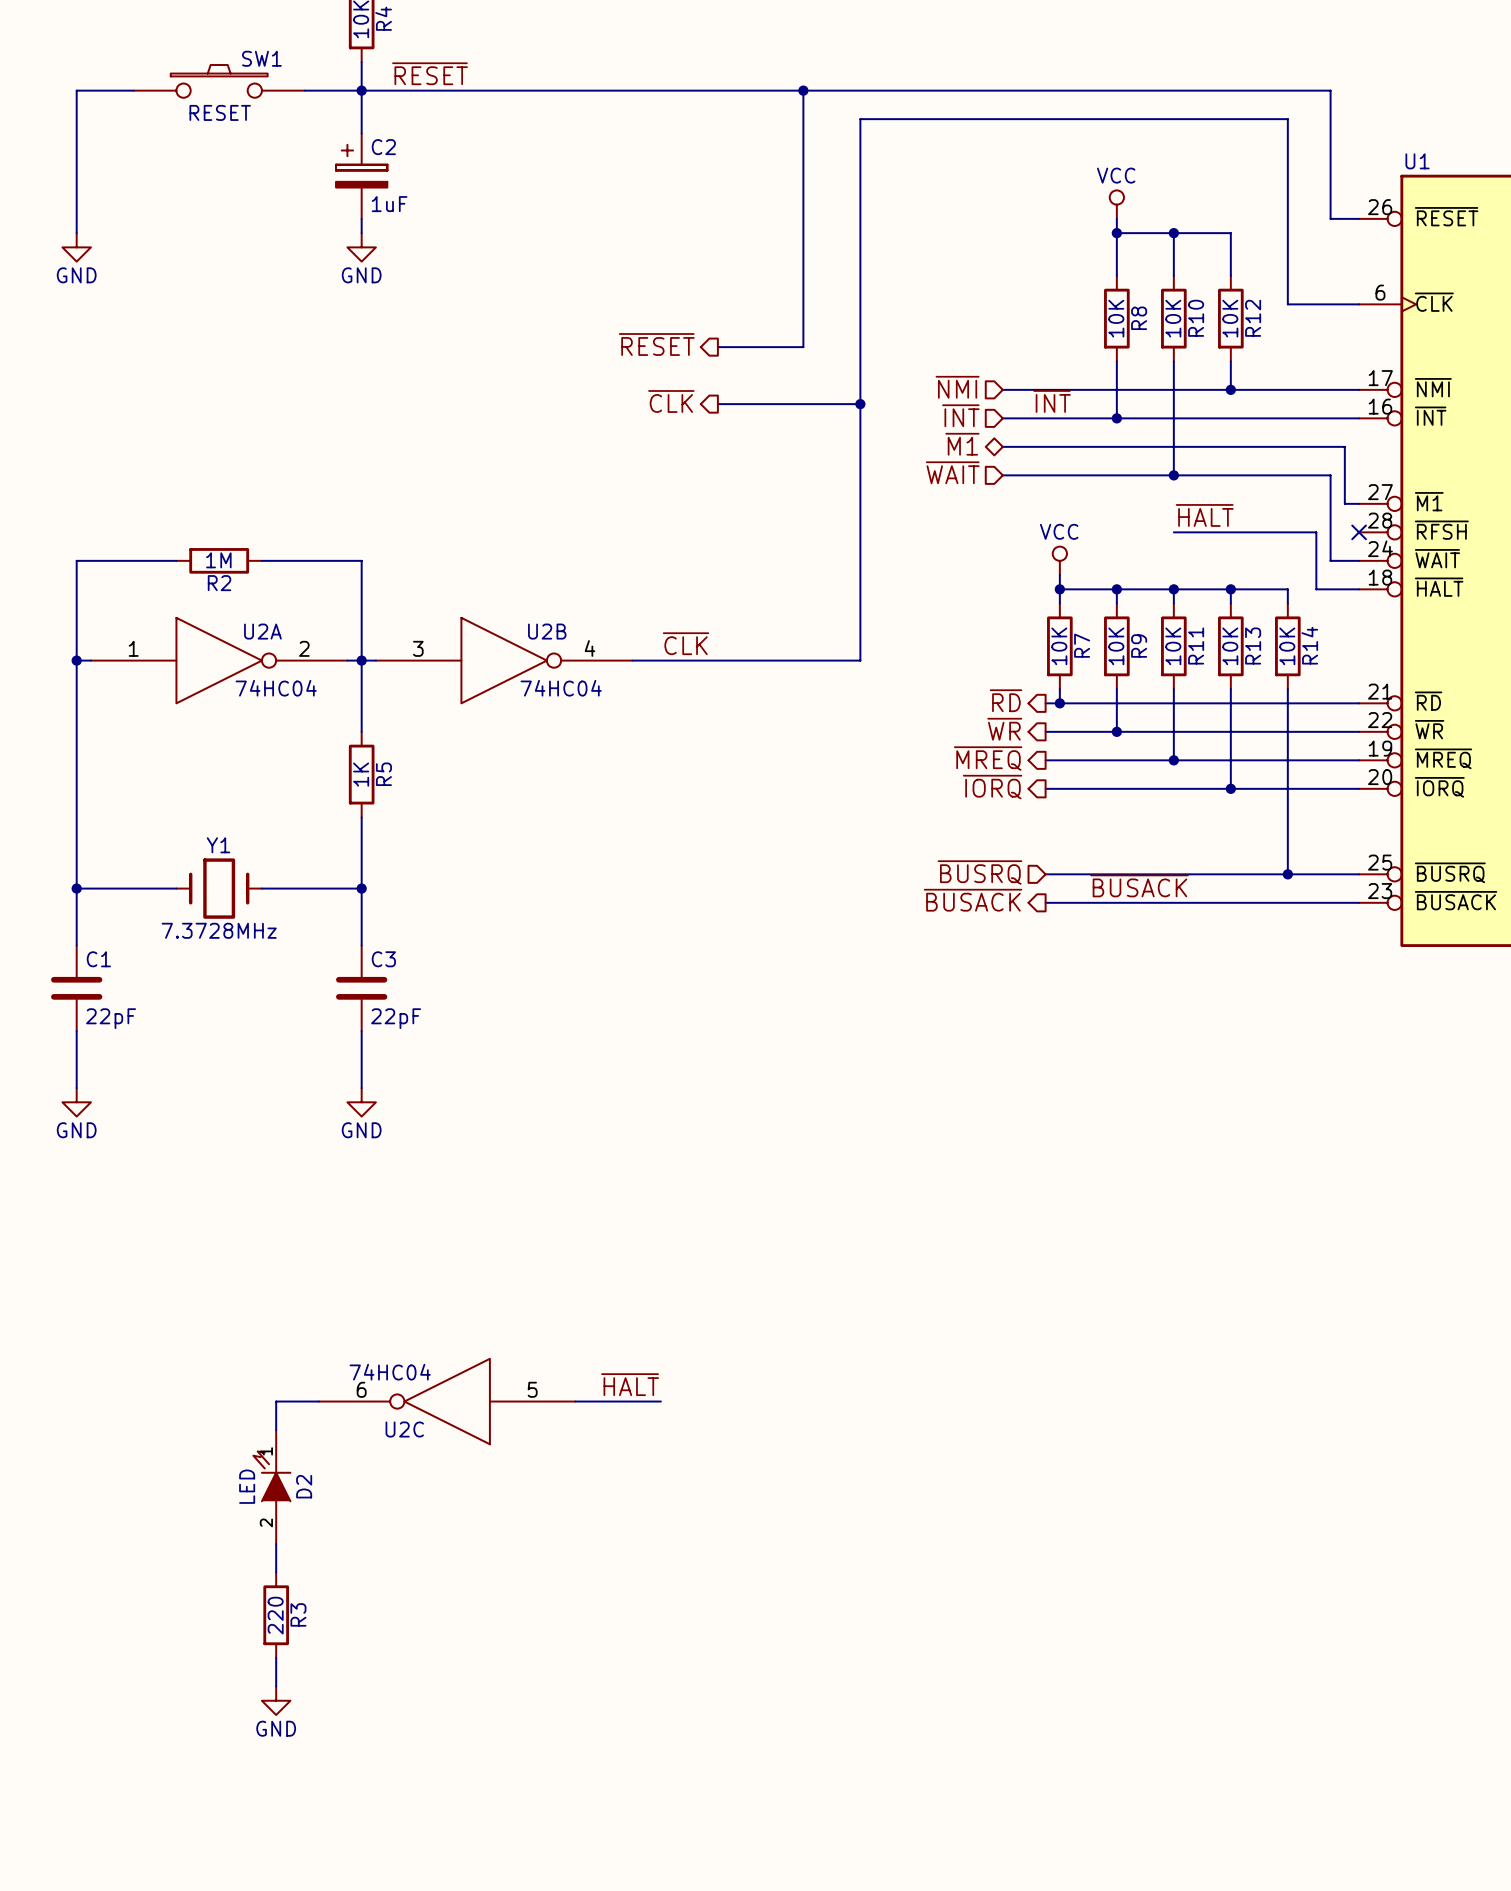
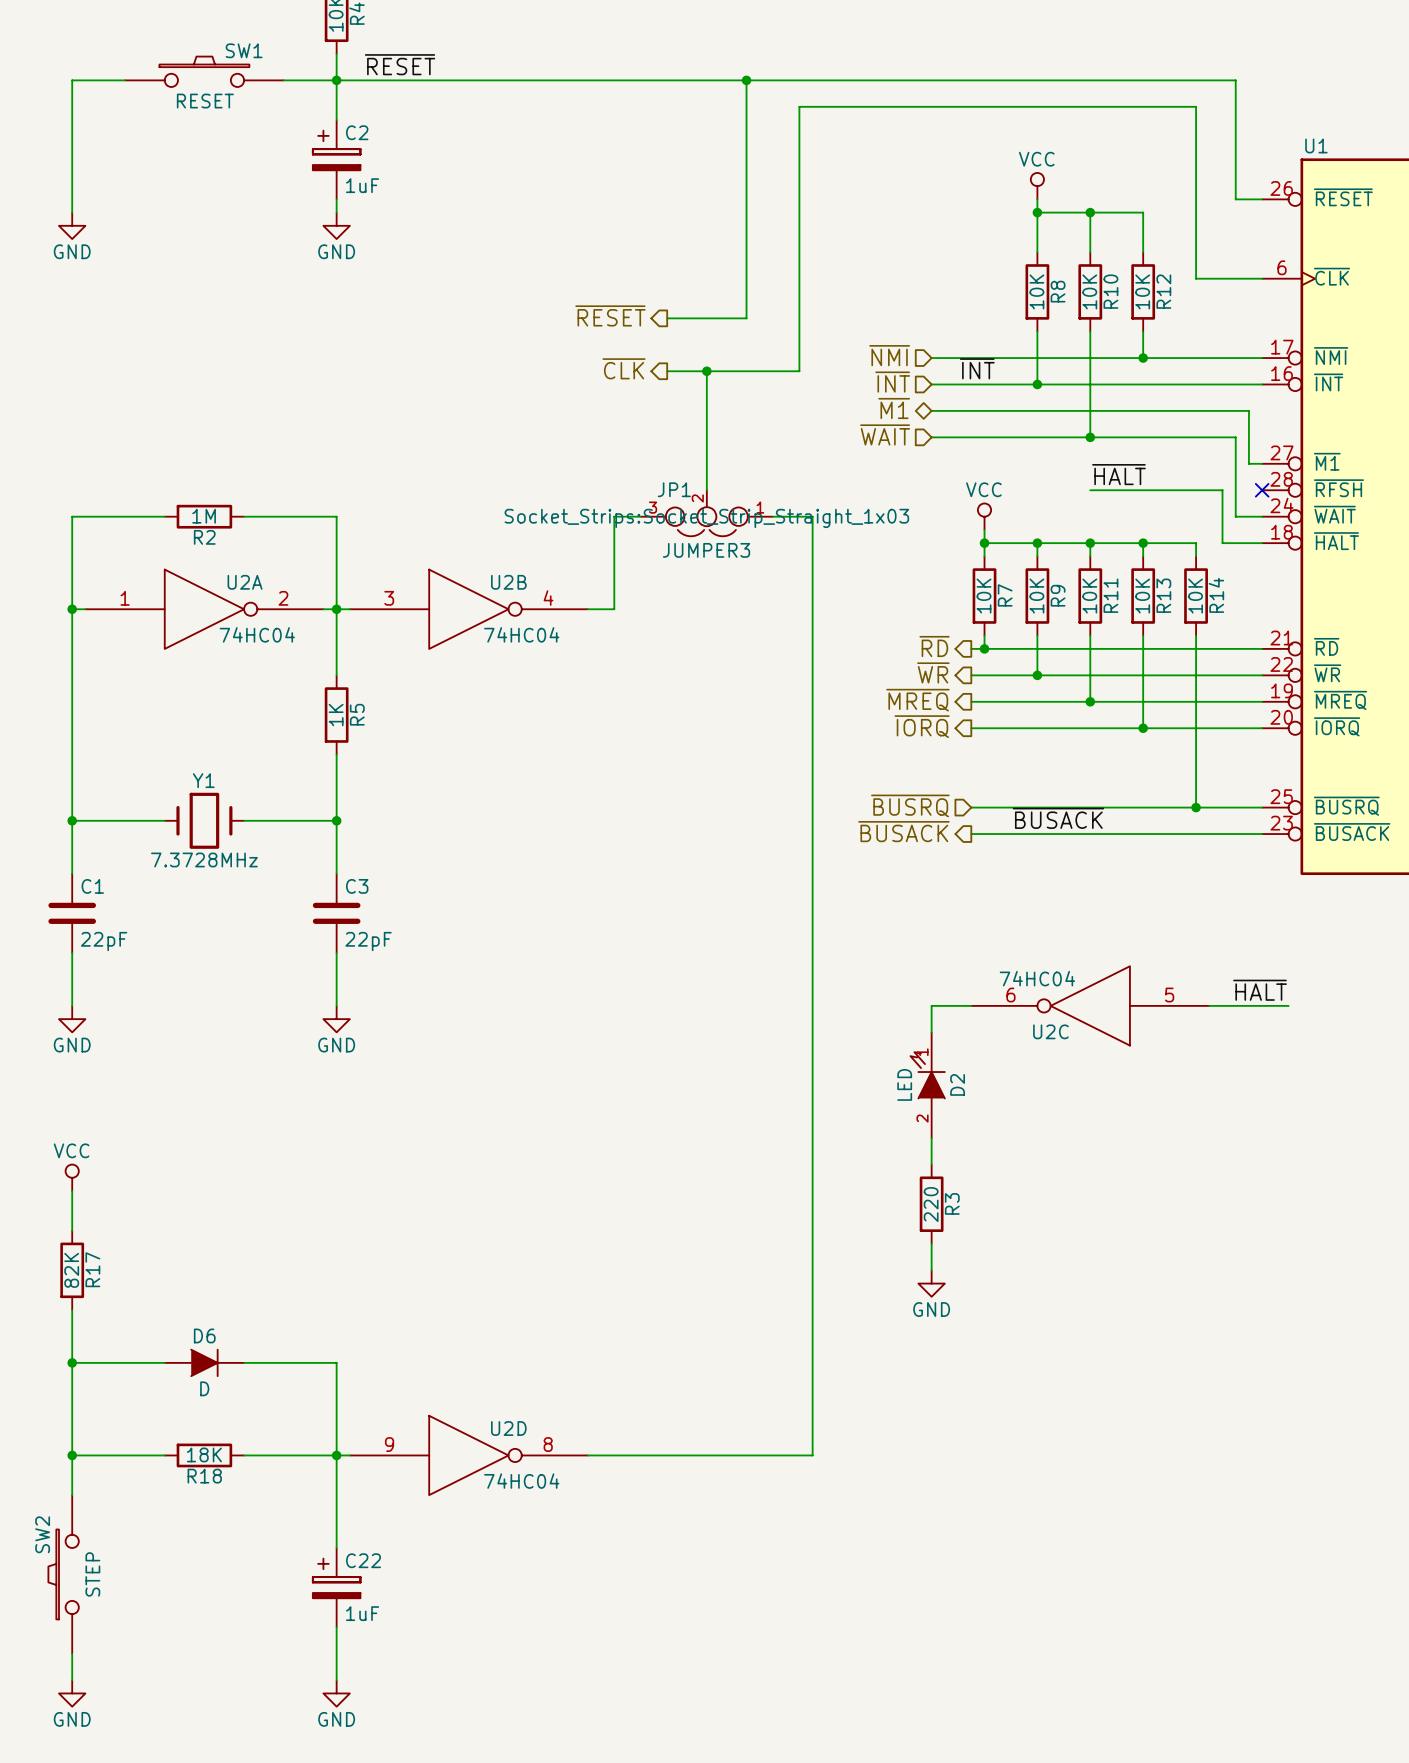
wire: none -> (706, 371) (706, 490)
junction: none -> (706, 371)
wire: (860, 404) (860, 660) (660, 660) -> (640, 516) (614, 516) (614, 609)
junction: (860, 404) -> none
JP1: none -> JUMPER3 (706, 513)
wire: none -> (772, 516) (812, 516) (812, 1455) (587, 1455)
label: ~{CLK} (686, 643) -> none
label: none -> ~{HALT} (1260, 990)
wire: none -> (971, 1005) (931, 1005) (931, 1032)
wire: none -> (1209, 1005) (1288, 1005)
wire: none -> (931, 1138) (931, 1164)
power symbol: none -> VCC (72, 1177)
wire: none -> (72, 1191) (72, 1230)
wire: none -> (931, 1243) (931, 1270)
R17: none -> 82K (72, 1270)
label: ~{HALT} (630, 1384) -> none
power symbol: none -> GND (931, 1283)
wire: (318, 1401) (276, 1401) (276, 1430) -> none
U2C position: (447, 1401) -> (1090, 1005)
wire: (575, 1401) (660, 1401) -> none
wire: none -> (72, 1310) (72, 1495)
wire: none -> (72, 1362) (164, 1362)
junction: none -> (72, 1362)
D6: none -> D (204, 1362)
wire: none -> (244, 1362) (336, 1362) (336, 1548)
D2 position: (271, 1487) -> (927, 1085)
wire: (276, 1544) (276, 1572) -> none
wire: none -> (72, 1455) (164, 1455)
junction: none -> (72, 1455)
R18: none -> 18K (204, 1455)
wire: none -> (244, 1455) (349, 1455)
junction: none -> (336, 1455)
U2D: none -> 74HC04 (468, 1455)
R3 position: (276, 1615) -> (931, 1204)
wire: (276, 1658) (276, 1686) -> (72, 1653) (72, 1680)
SW2: none -> STEP (63, 1574)
power symbol: GND (276, 1700) -> none
C22: none -> 1uF (336, 1587)
wire: none -> (336, 1627) (336, 1680)
power symbol: none -> GND (72, 1693)
power symbol: none -> GND (336, 1693)

